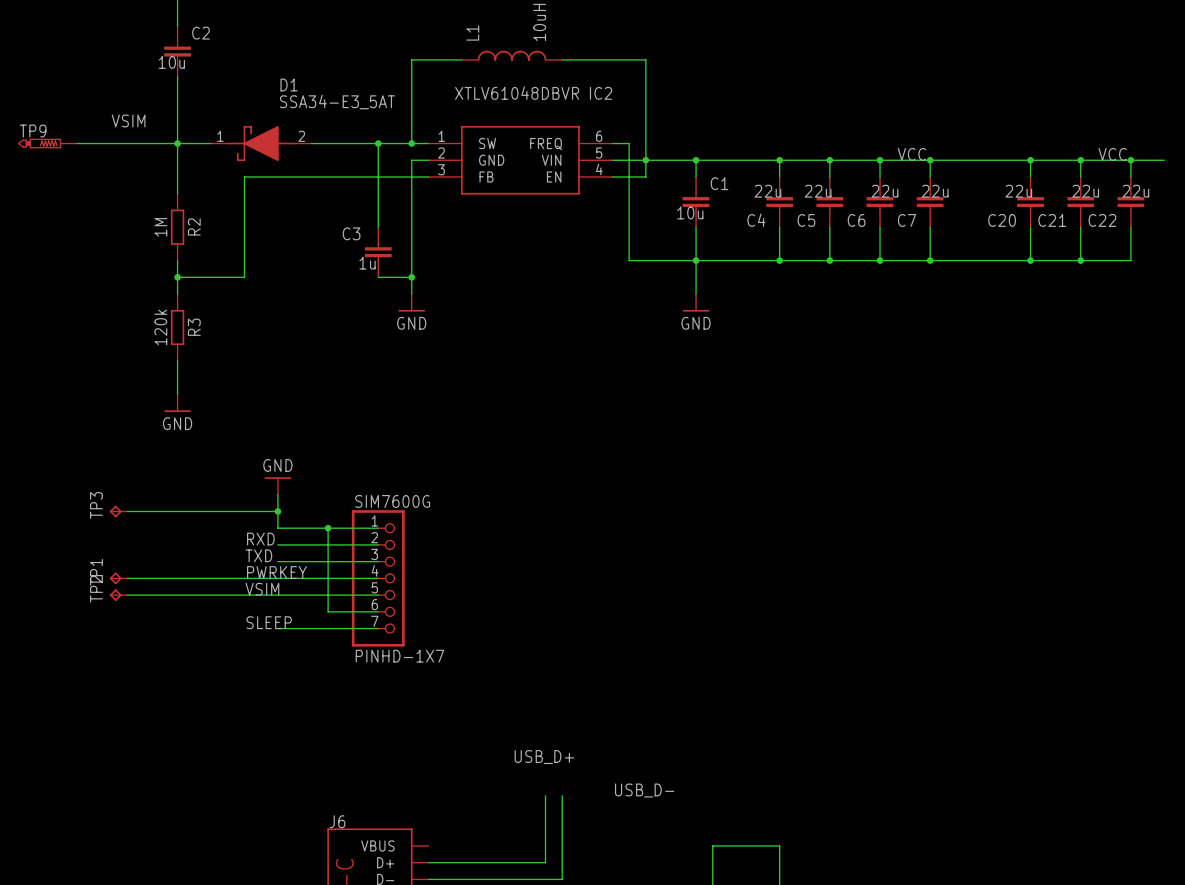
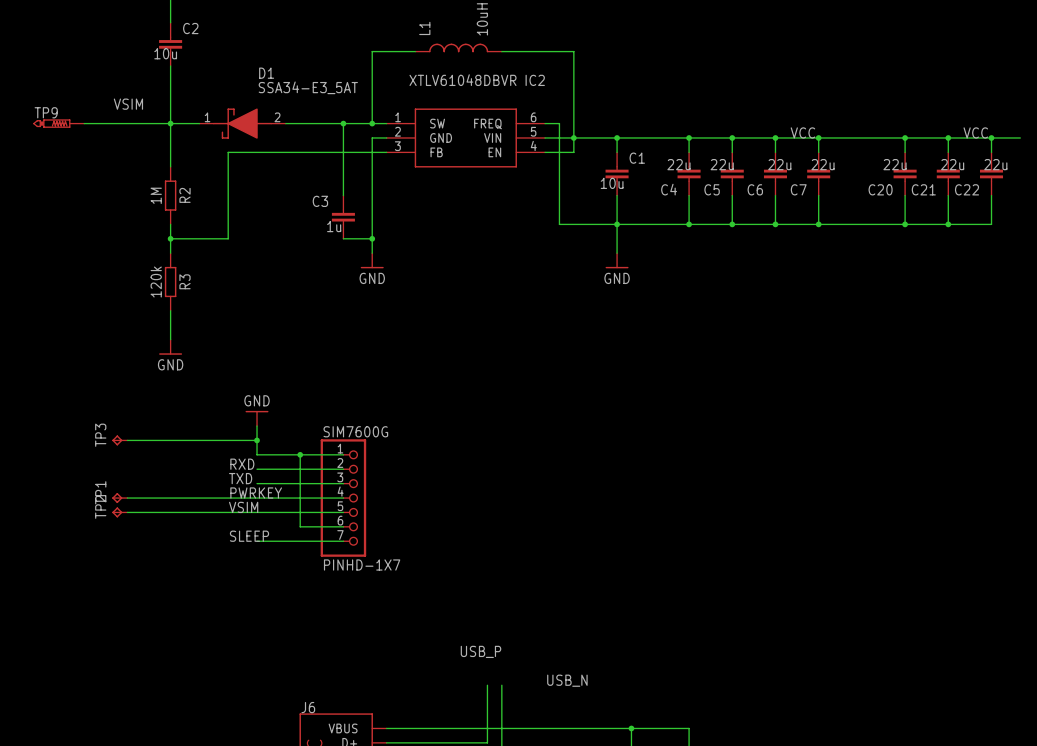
label: USB_D+ (544, 757) -> USB_P (480, 651)
label: USB_D- (644, 790) -> USB_N (567, 680)
wire: none -> (386, 728) (631, 728)
junction: none -> (631, 728)

